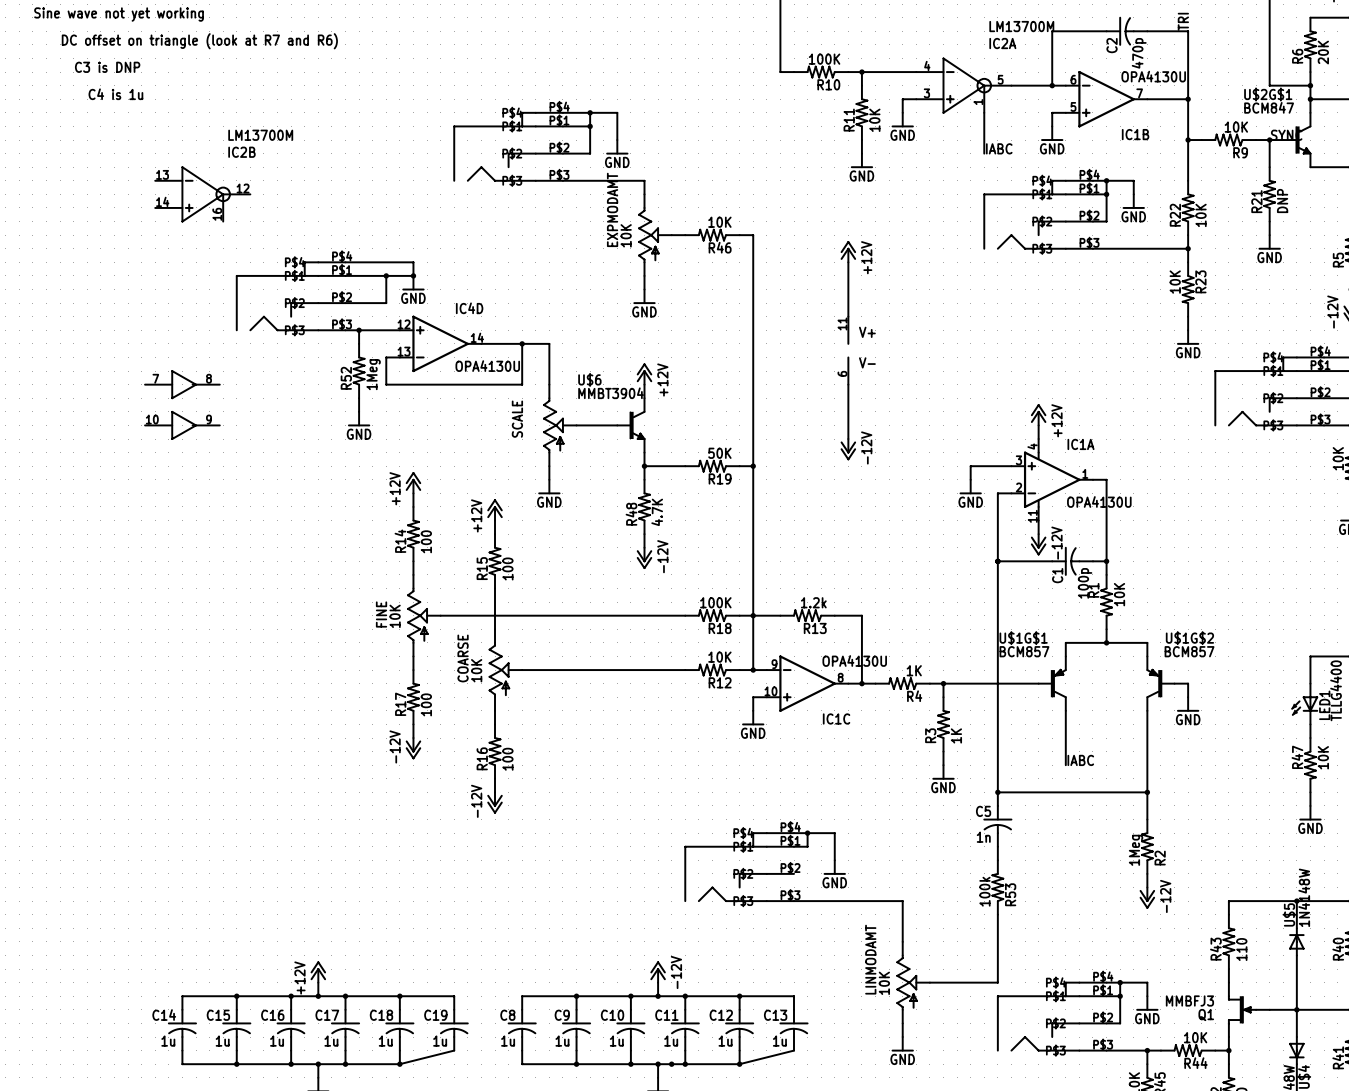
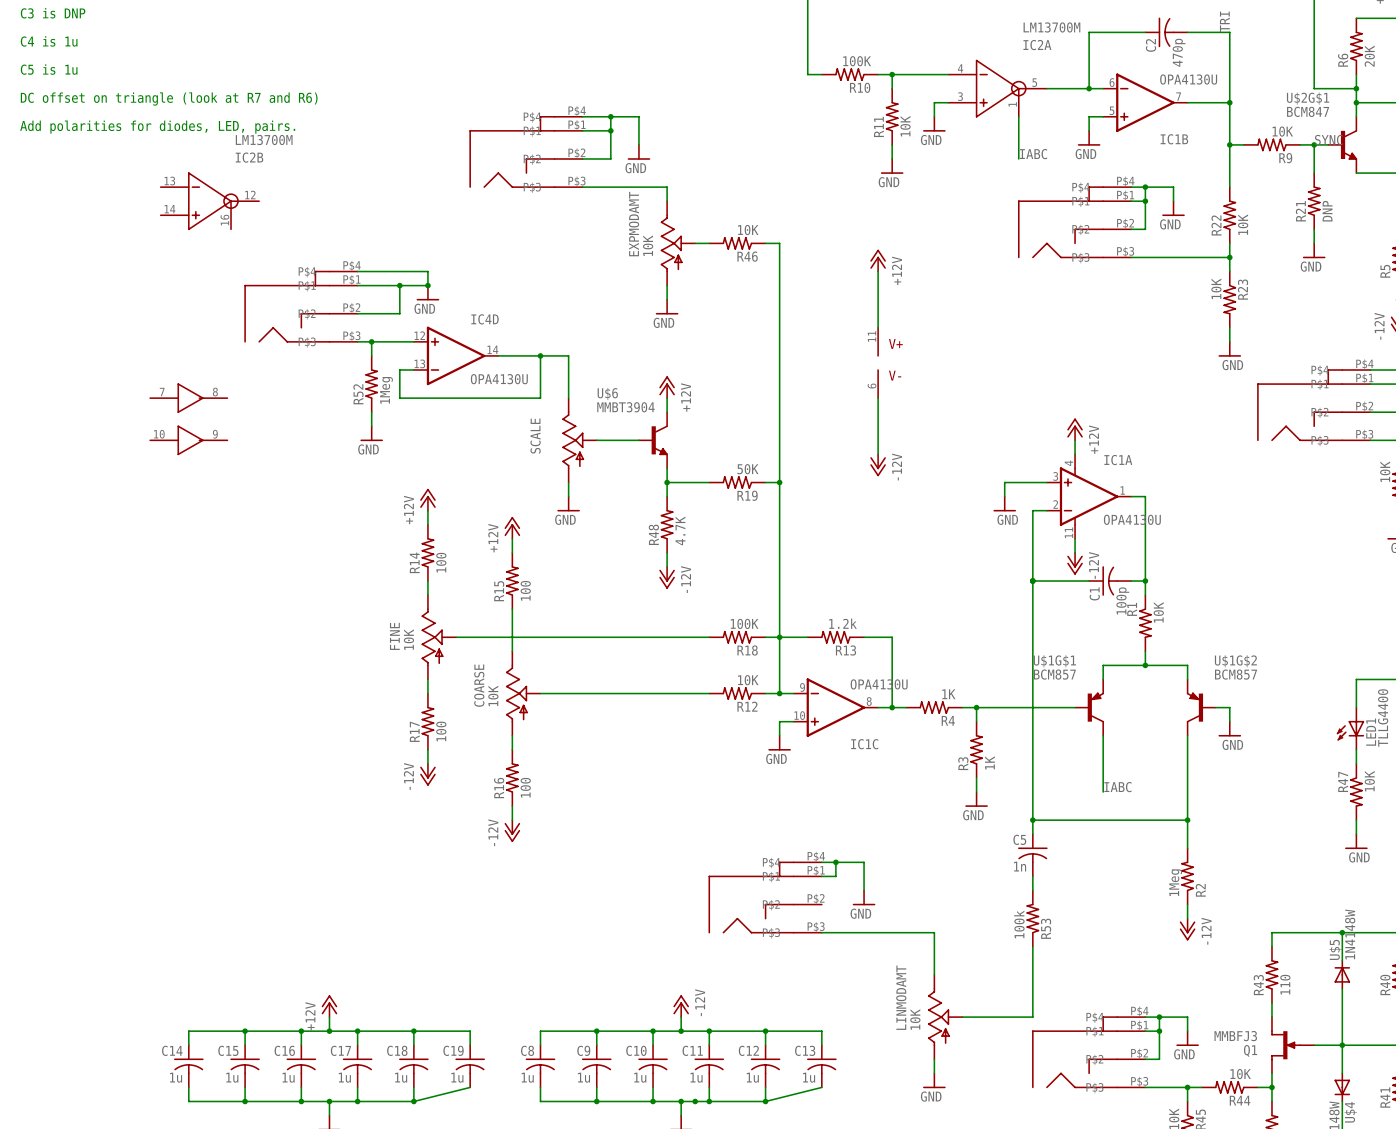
text: Sine wave not yet working (119, 14) -> none
text position: DC offset on triangle (look at R7 and R6) (199, 41) -> DC offset on triangle (look at R7 and R6) (169, 99)
text: none -> C5 is 1u (49, 69)
text position: C3 is DNP (107, 67) -> C3 is DNP (53, 13)
text position: C4 is 1u (115, 94) -> C4 is 1u (49, 41)
text: none -> Add polarities for diodes, LED, pairs. (157, 127)

